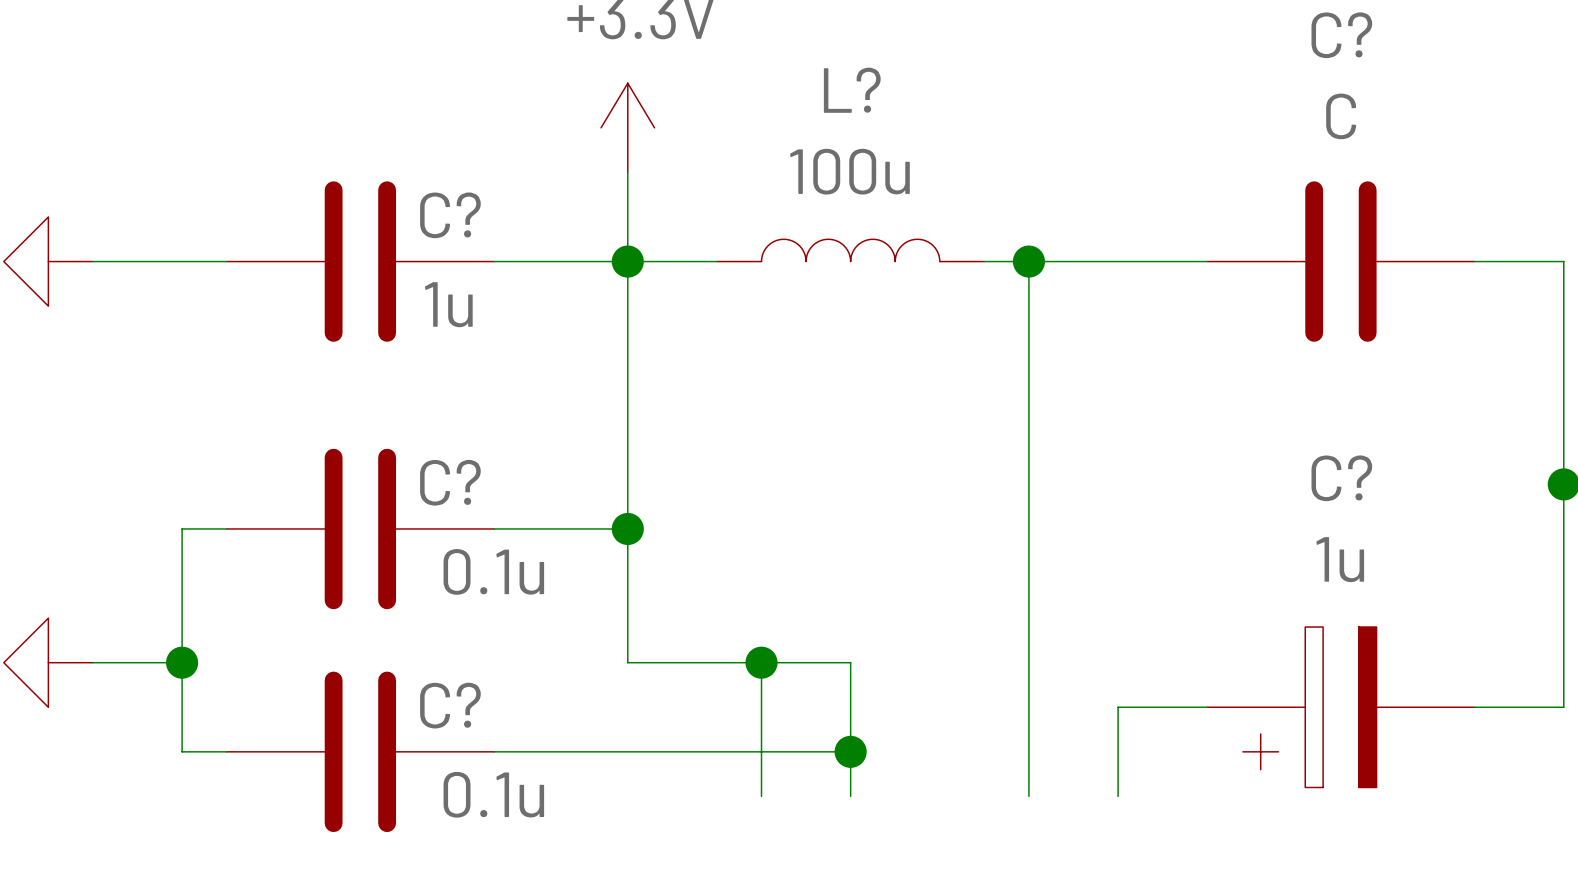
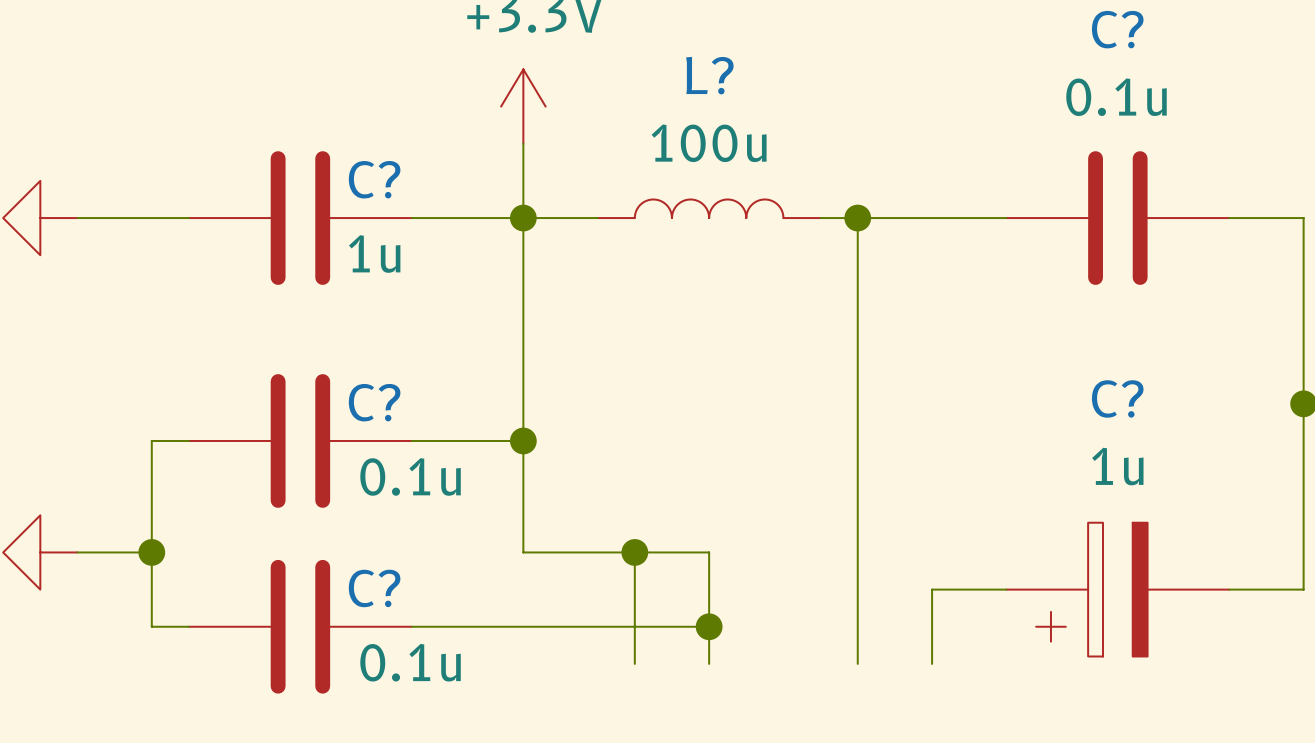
C? value: C (1341, 116) -> 0.1u (1116, 97)

